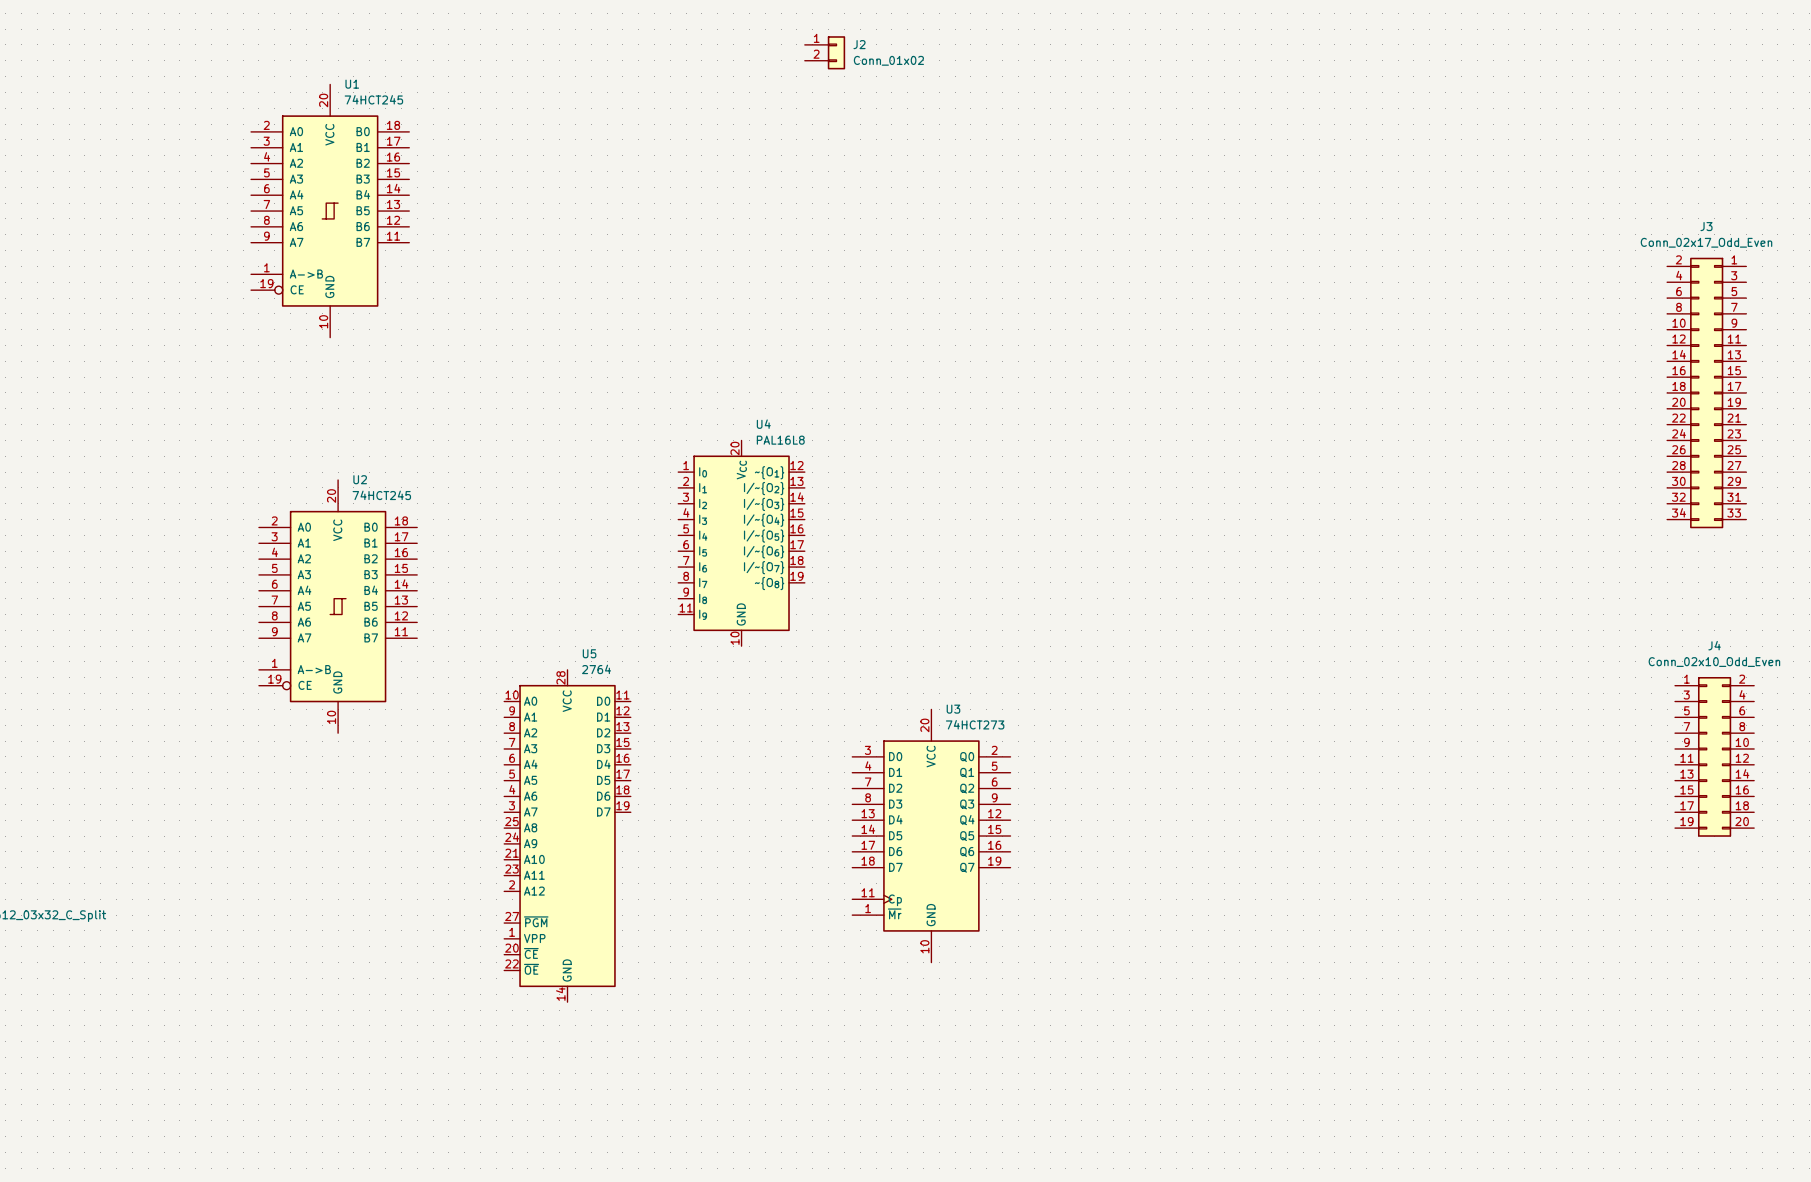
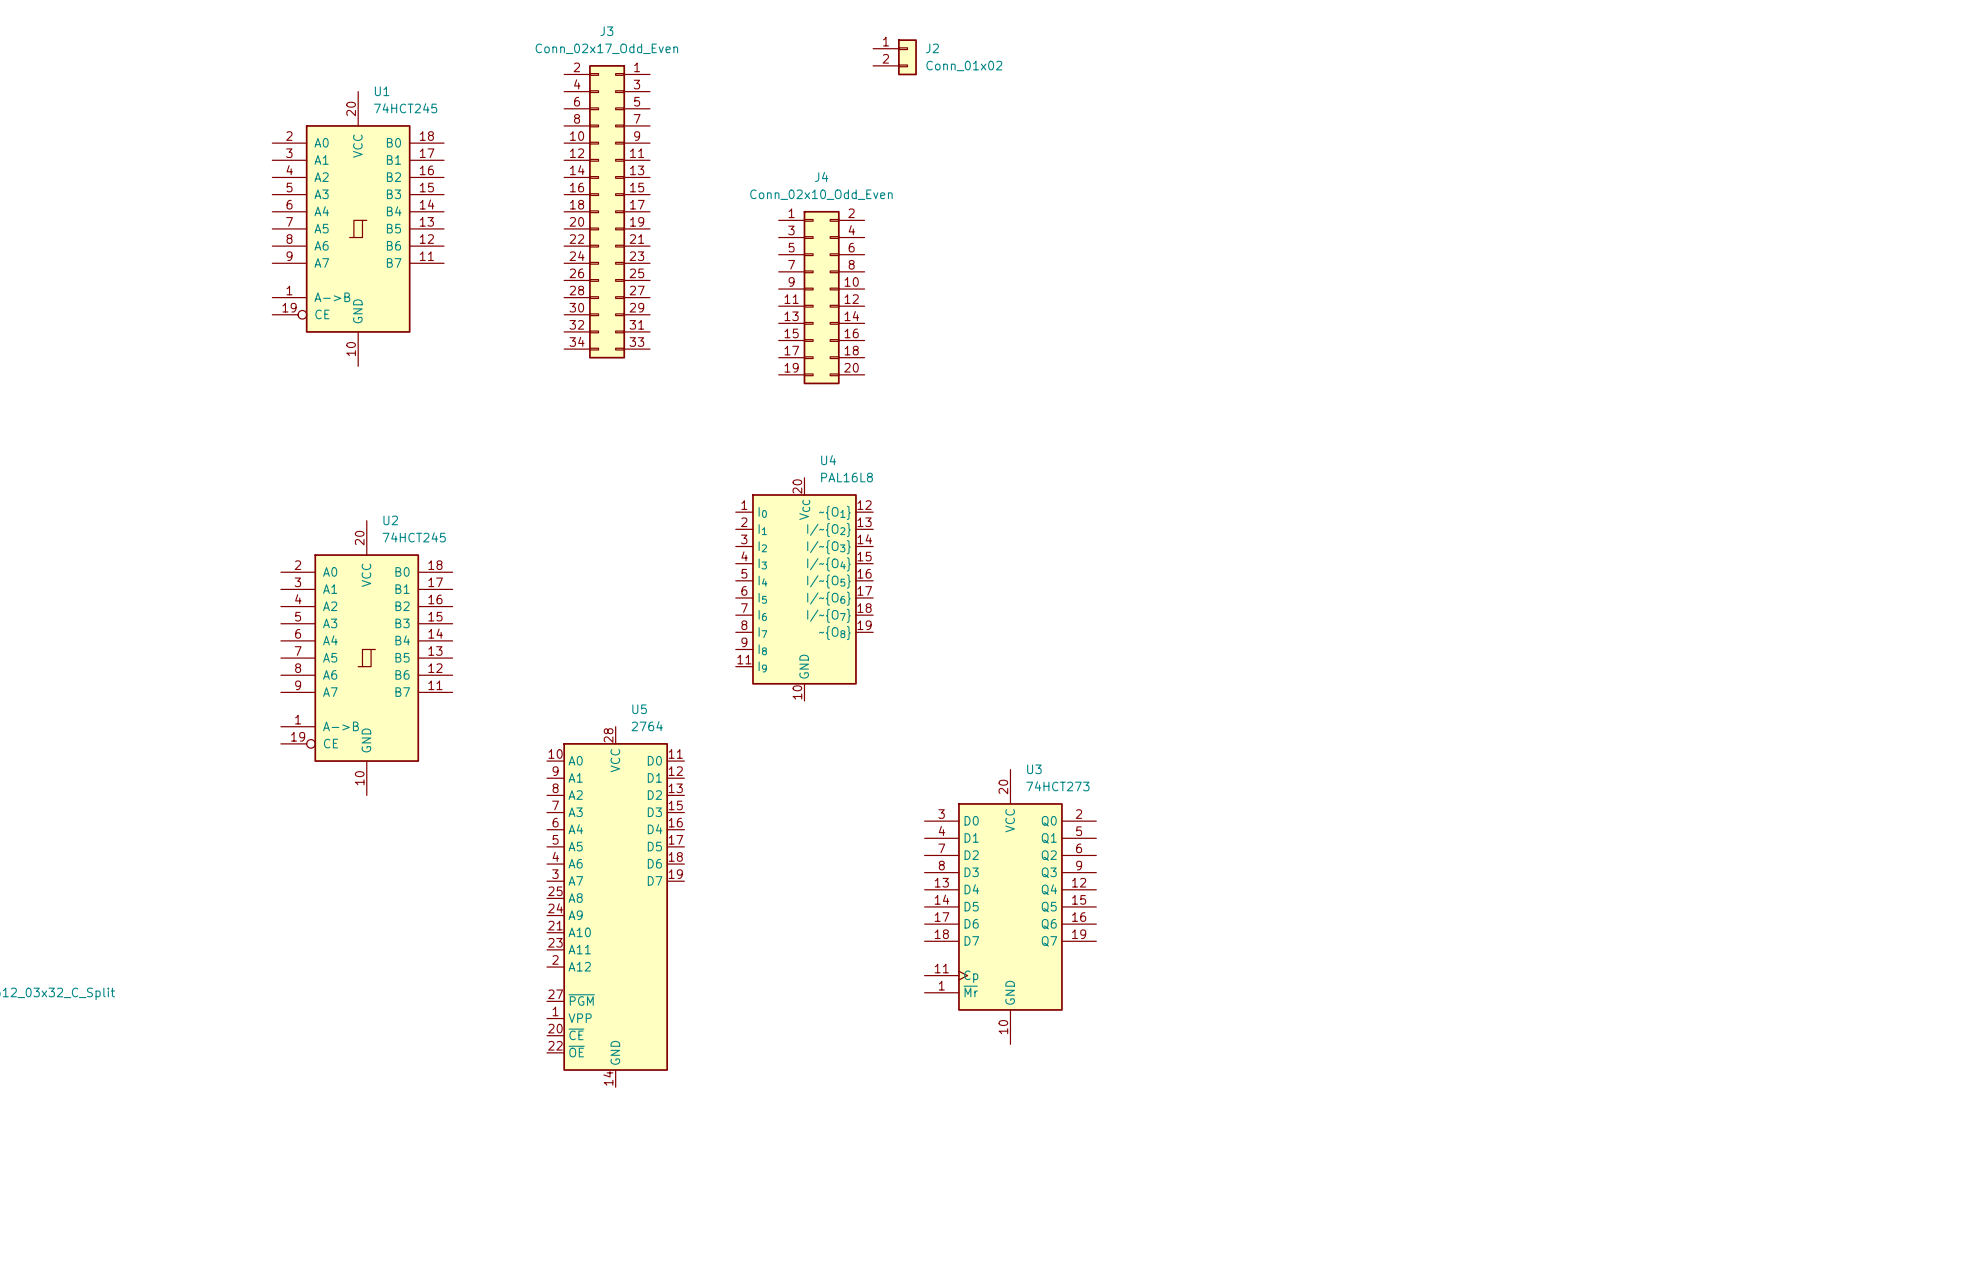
J3 position: (1706, 392) -> (607, 211)
J4 position: (1714, 756) -> (821, 297)

